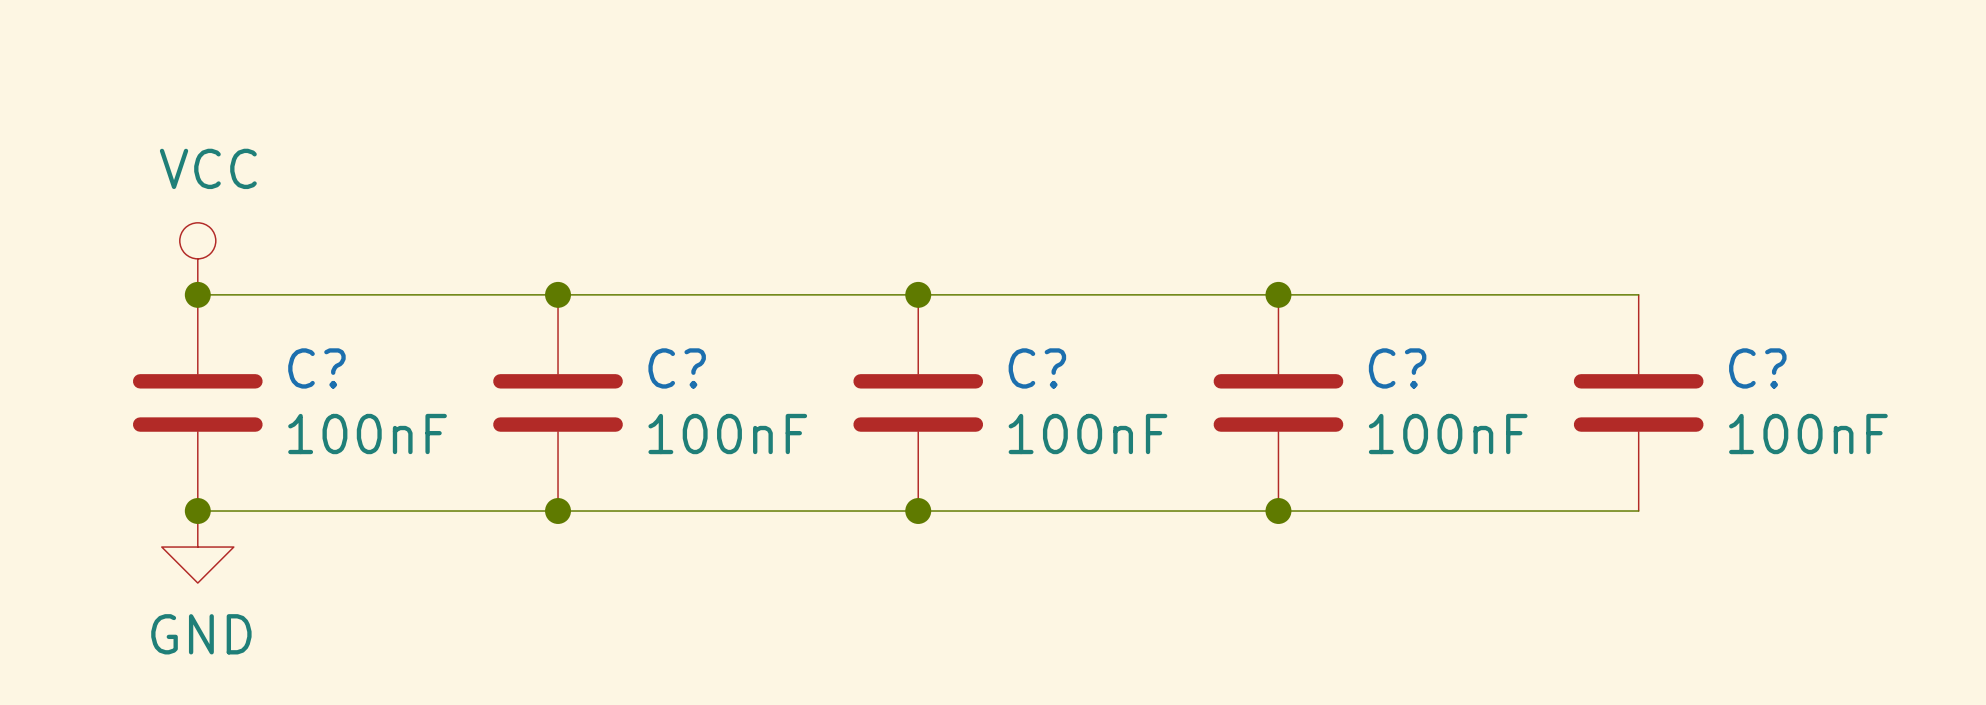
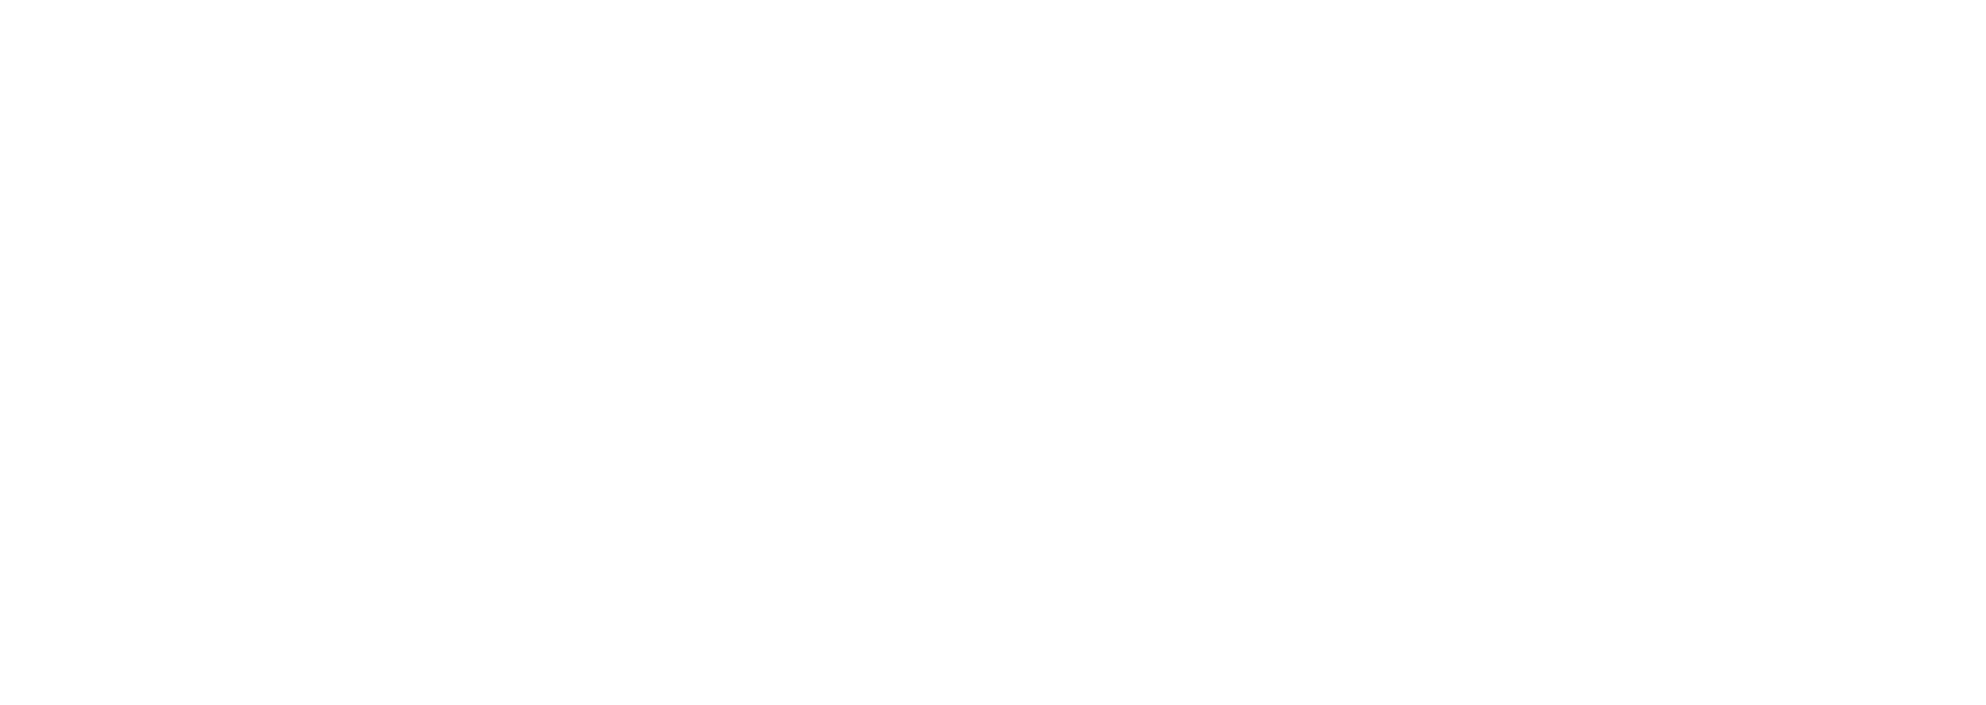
power symbol: VCC (197, 258) -> none
wire: (197, 294) (1638, 294) -> none
junction: (197, 294) -> none
junction: (558, 294) -> none
junction: (918, 294) -> none
junction: (1278, 294) -> none
C?: 100nF (197, 402) -> none
C?: 100nF (558, 402) -> none
C?: 100nF (918, 402) -> none
C?: 100nF (1278, 402) -> none
C?: 100nF (1638, 402) -> none
wire: (197, 511) (1638, 511) -> none
junction: (197, 511) -> none
junction: (558, 511) -> none
junction: (918, 511) -> none
junction: (1278, 511) -> none
power symbol: GND (197, 547) -> none

